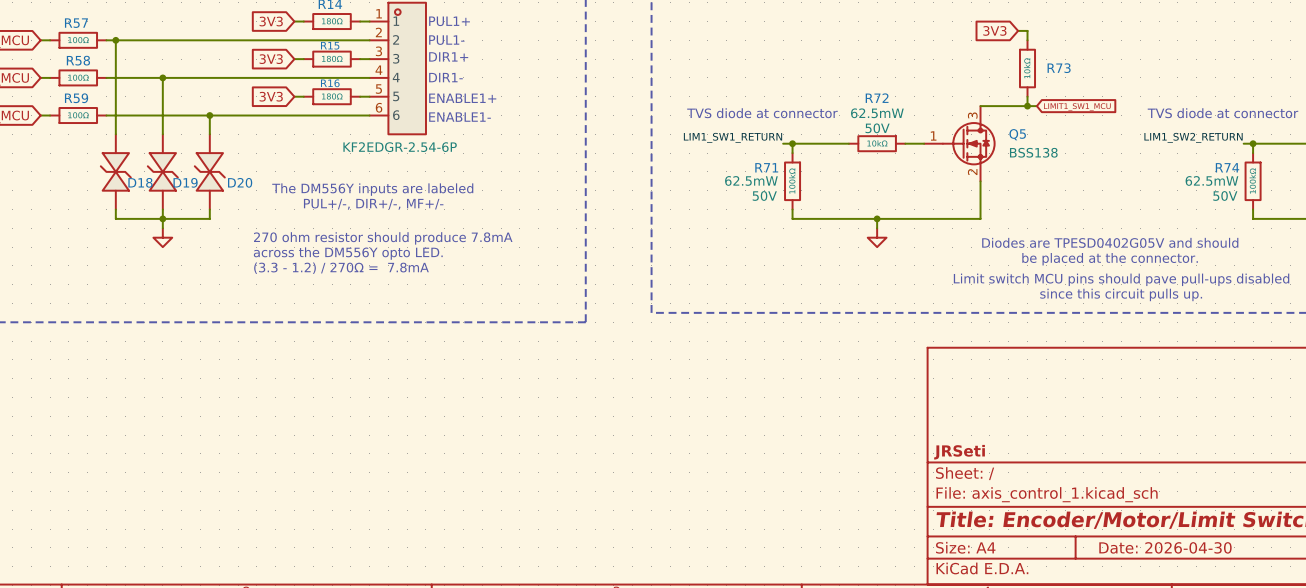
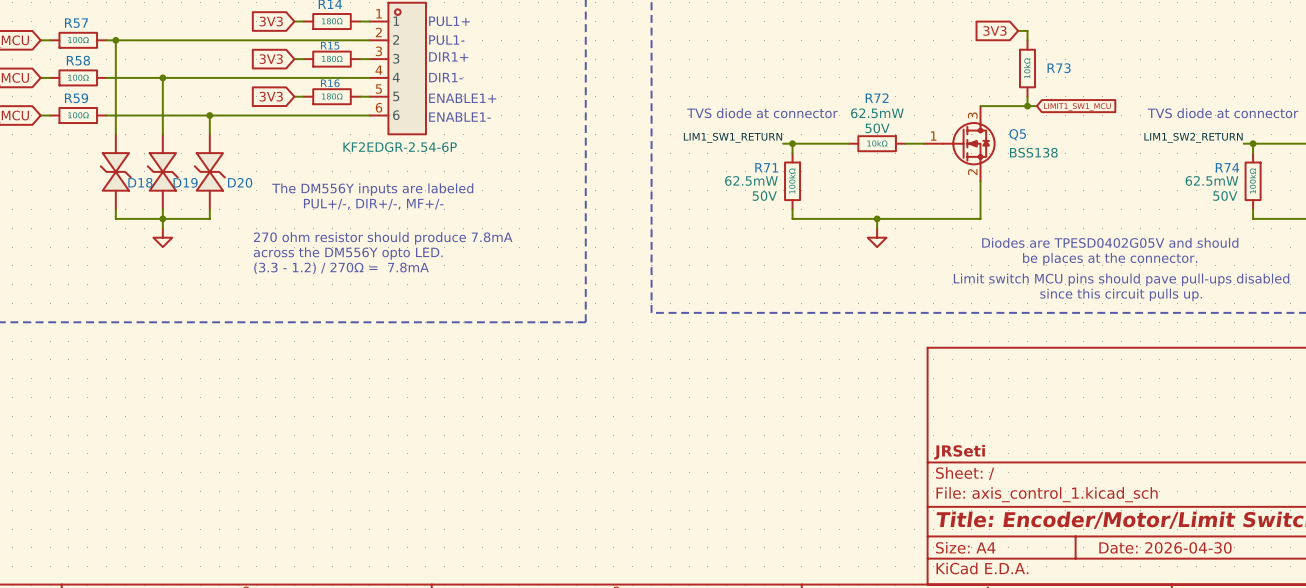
text: be placed at the connector. (1110, 259) -> be places at the connector. (1110, 259)

